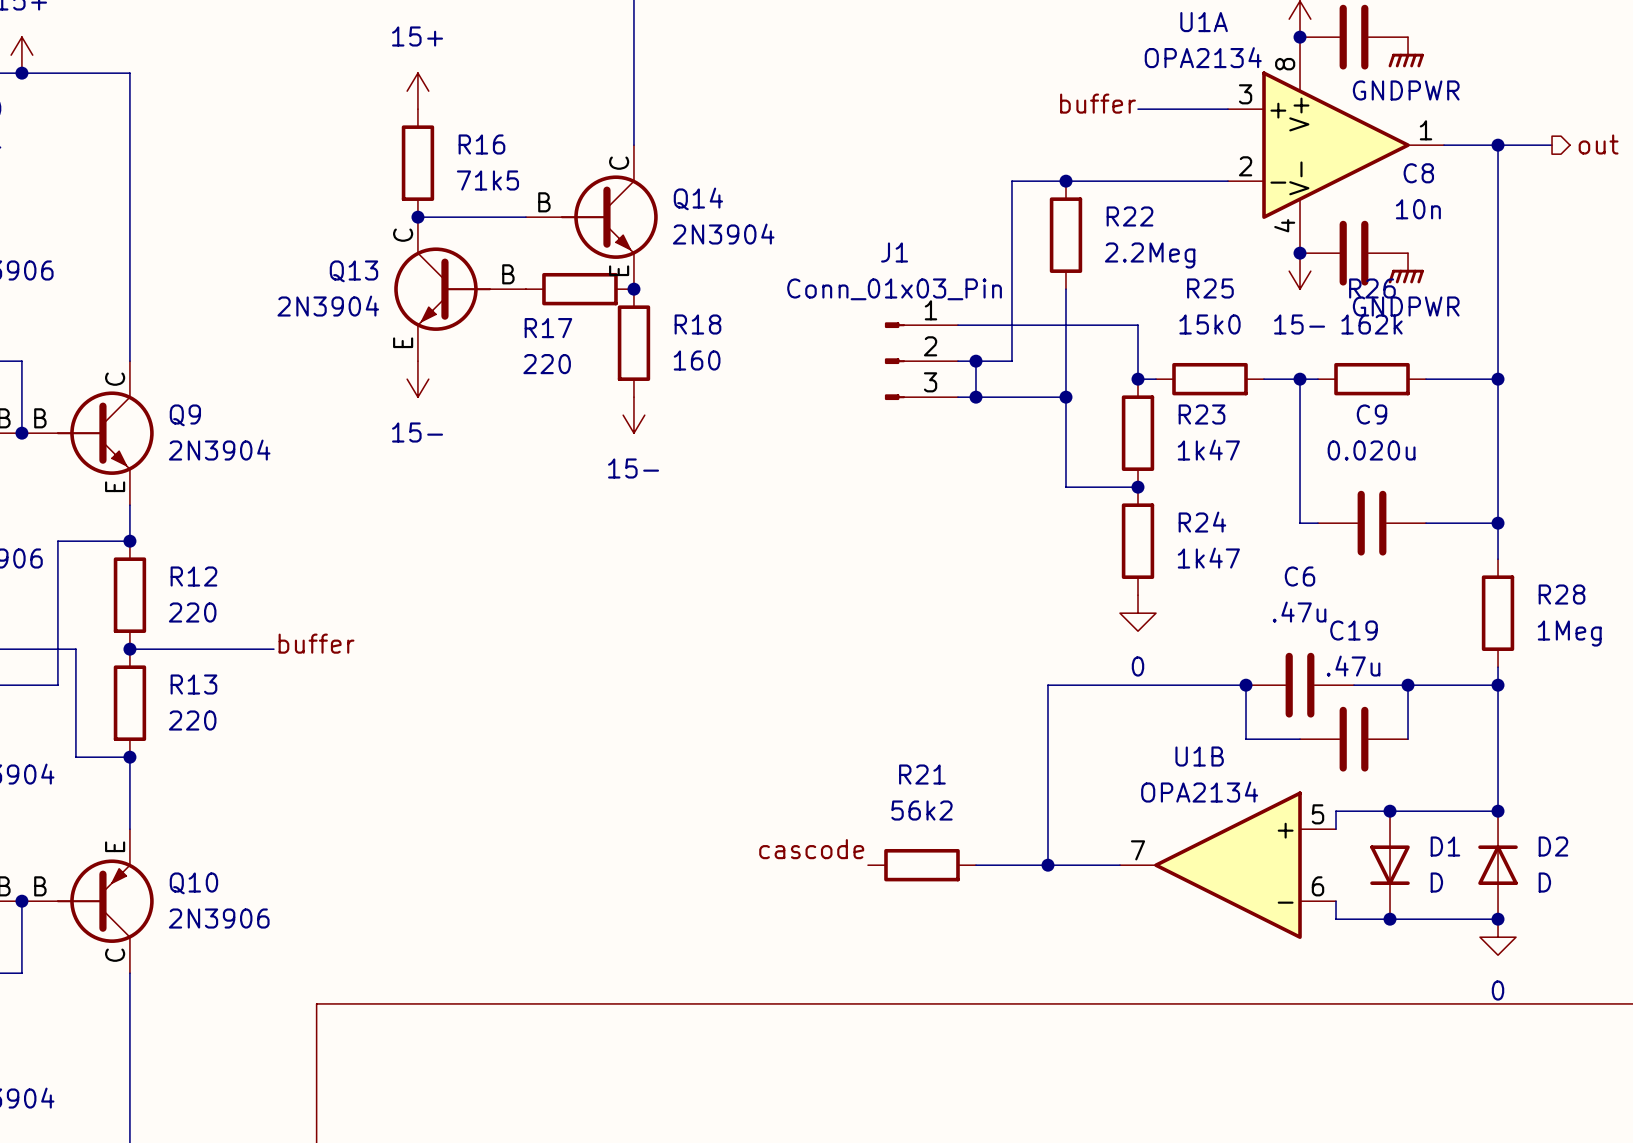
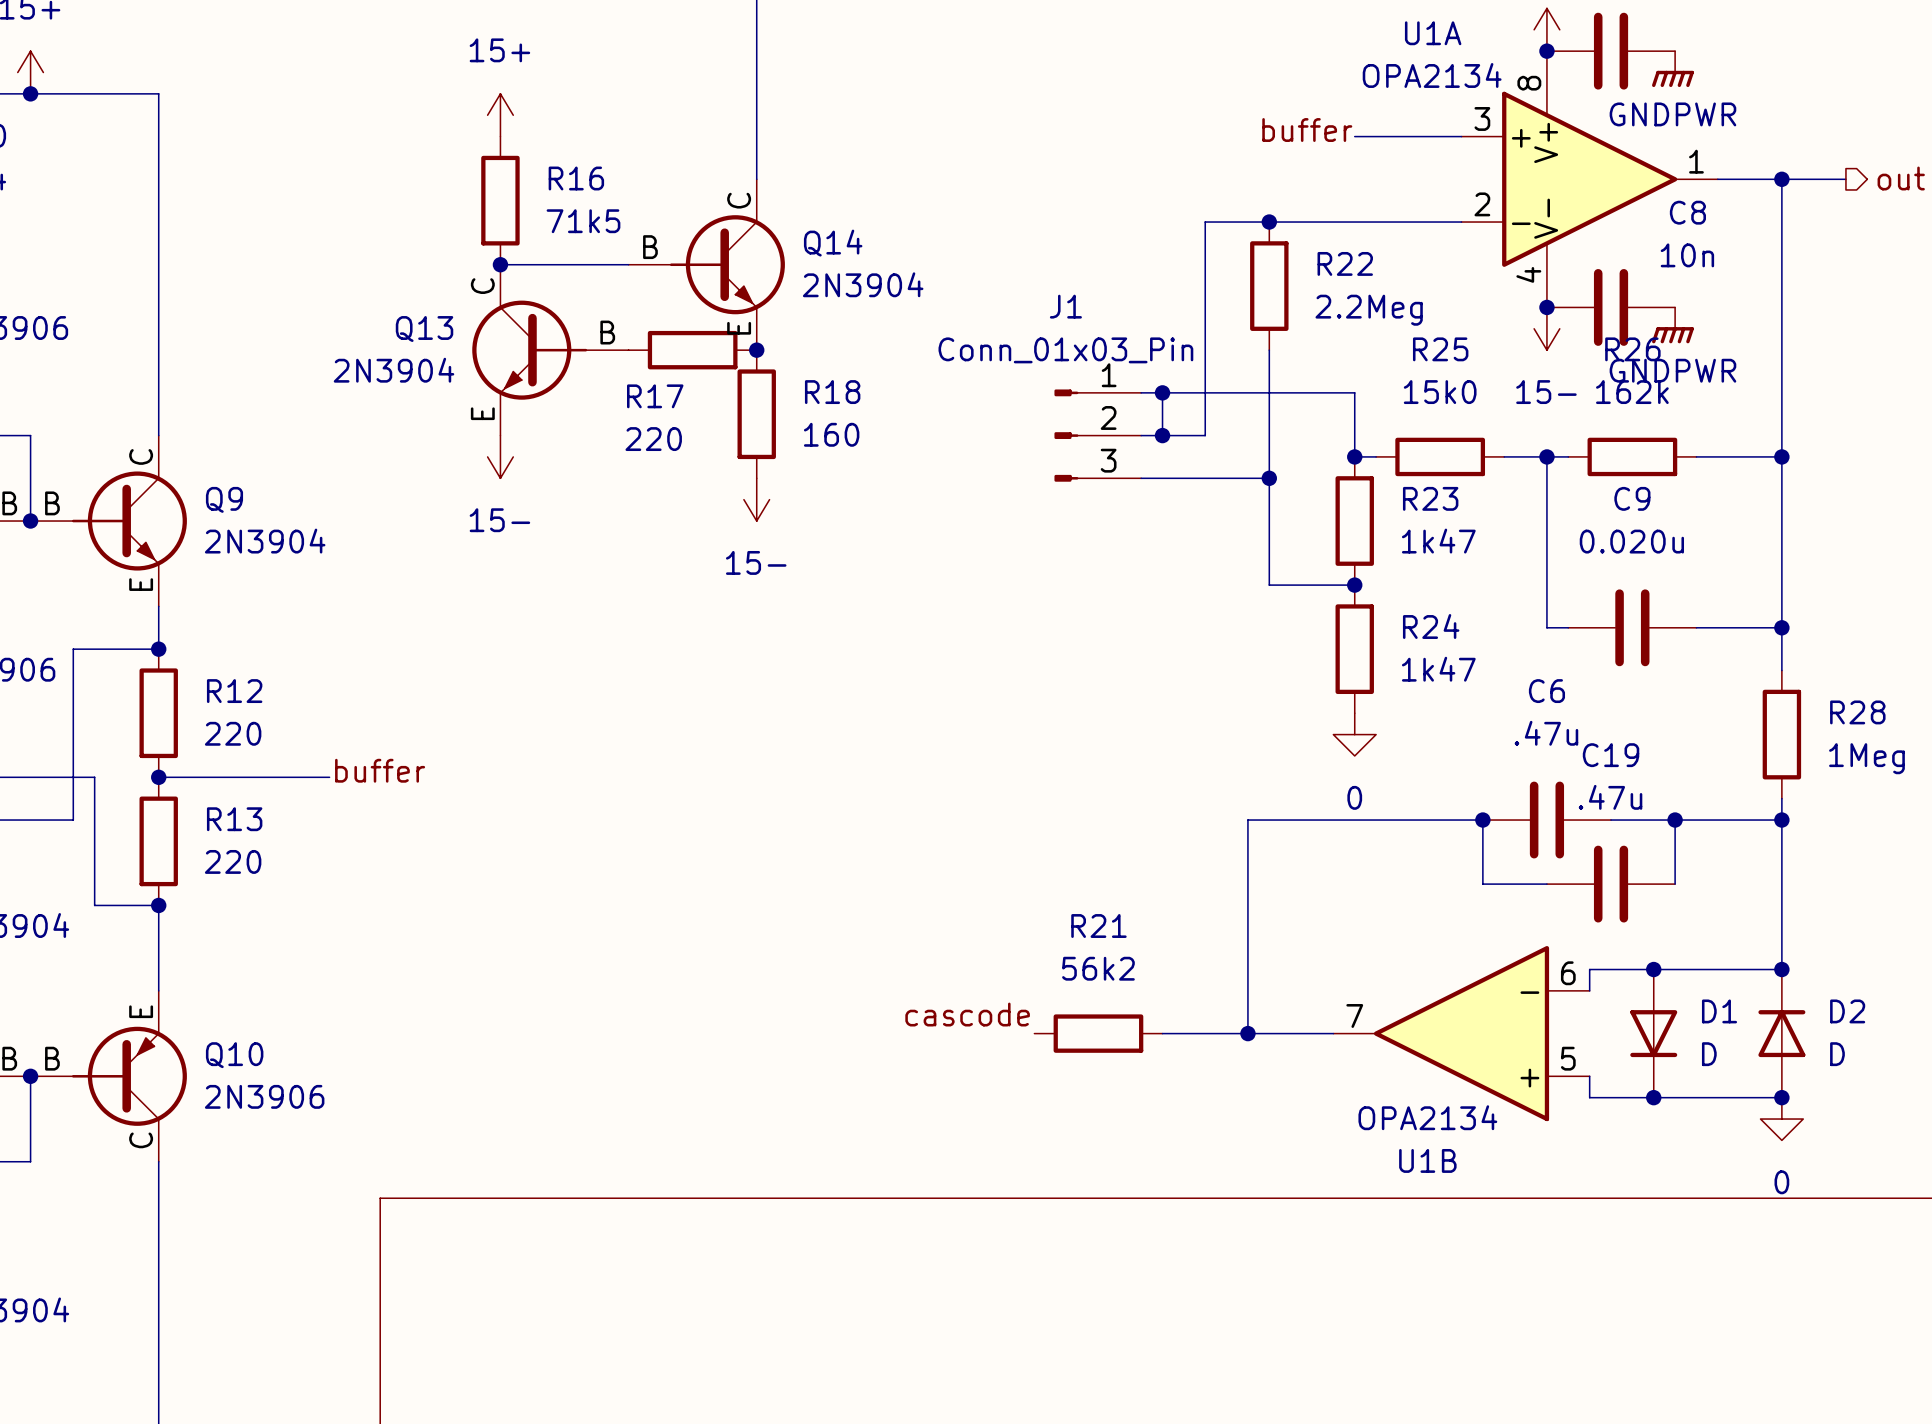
wire: (975, 361) (975, 397) -> (1162, 435) (1162, 392)
junction position: (975, 397) -> (1162, 392)
U1B flip: as is (1228, 865) -> up-down (1461, 1033)

